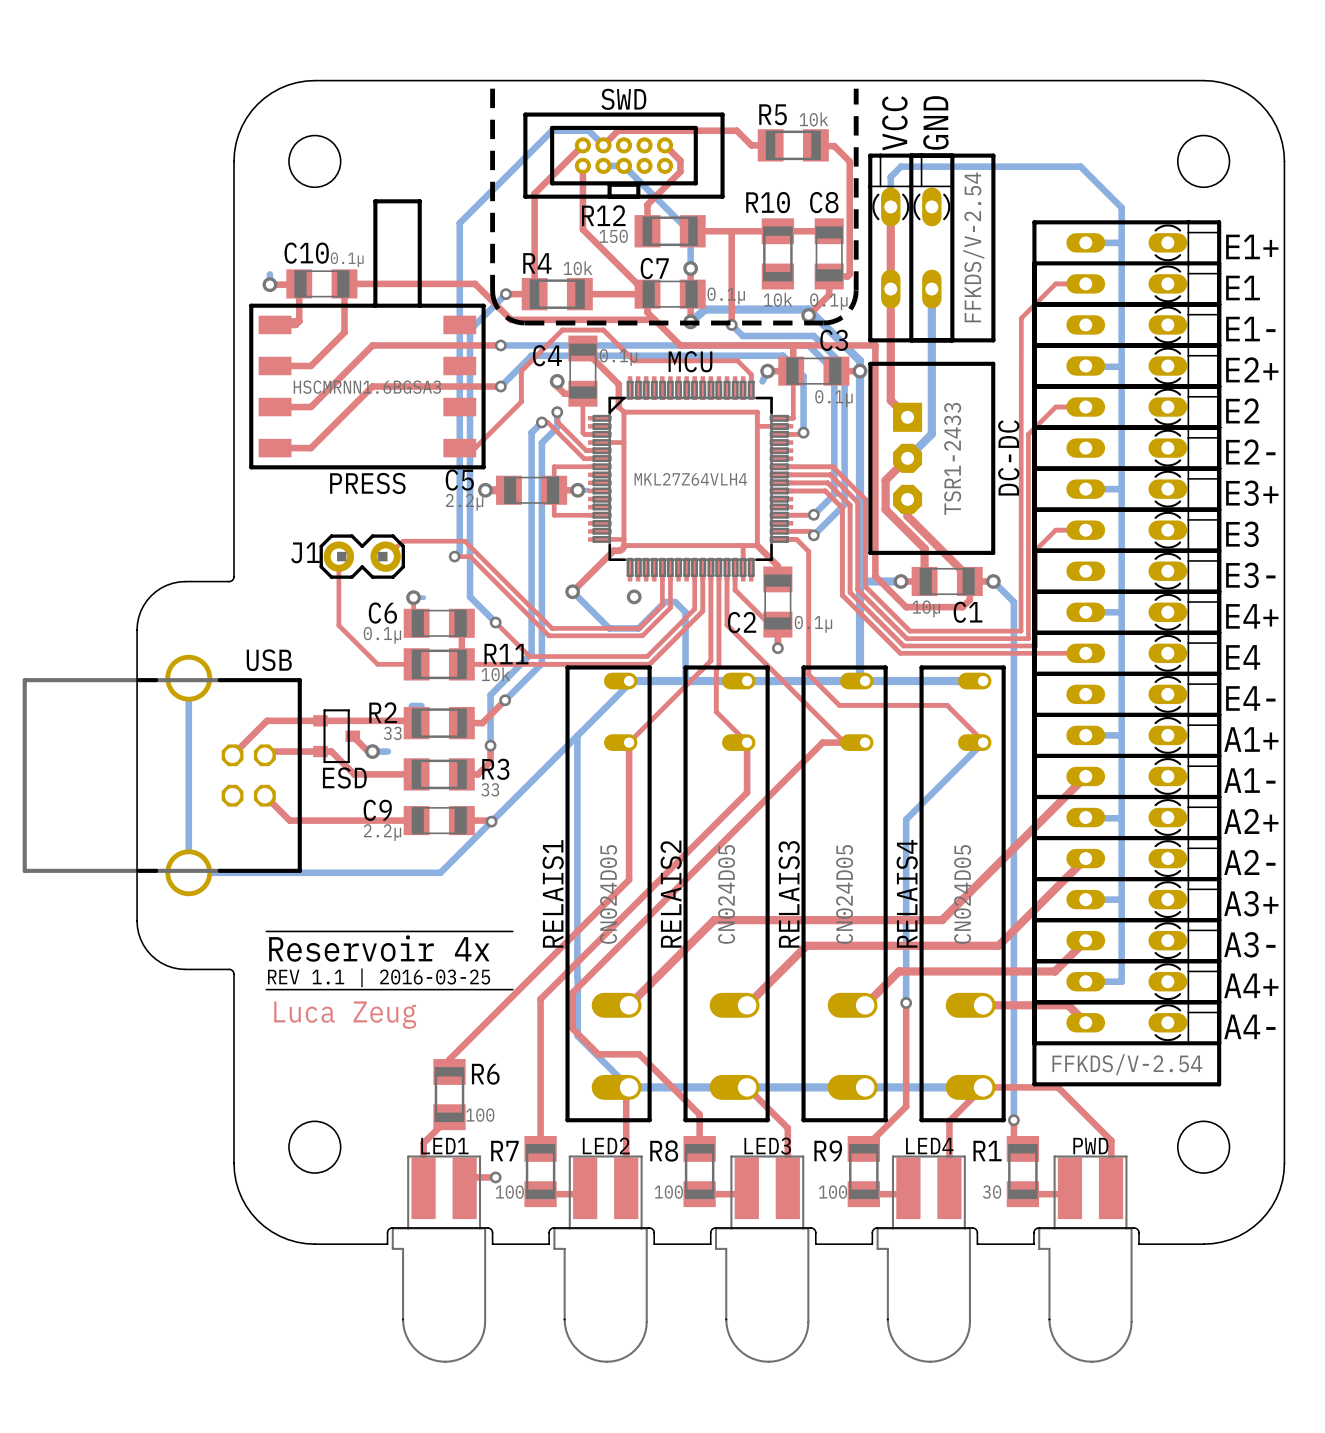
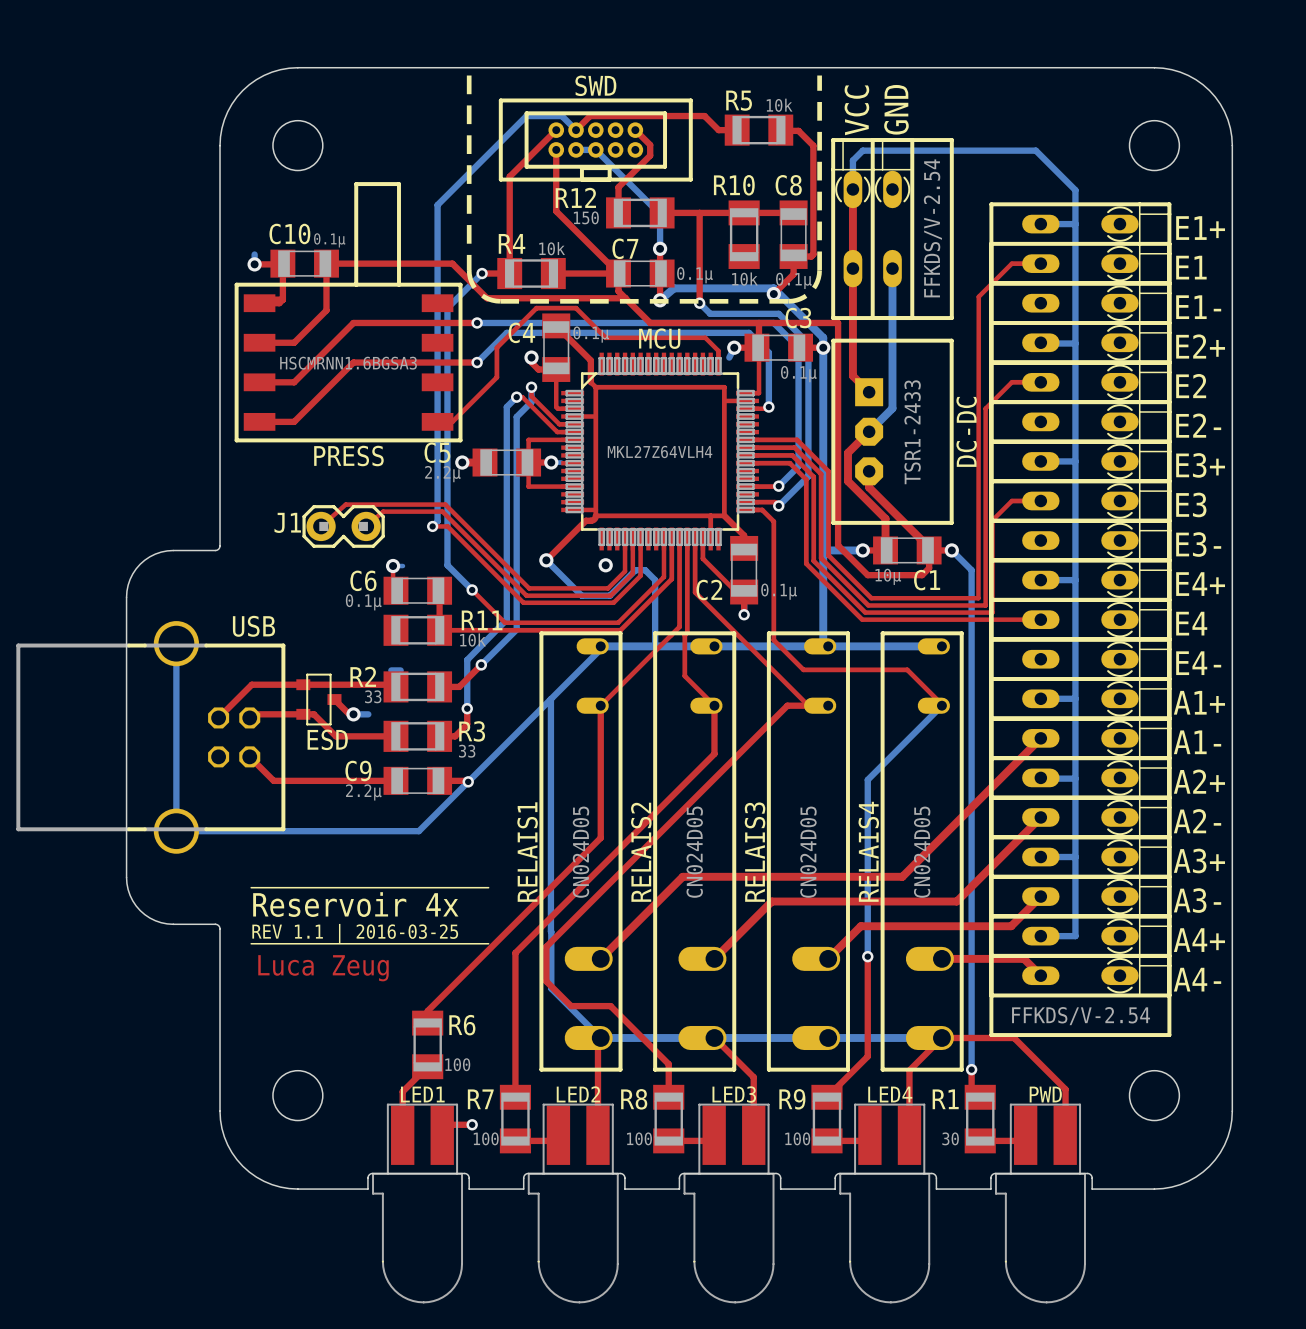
top track: (338, 556) (338, 625) (377, 664) (416, 664) -> (321, 526) (345, 504) (445, 504) (529, 588) (608, 588) (625, 571) (625, 538)

